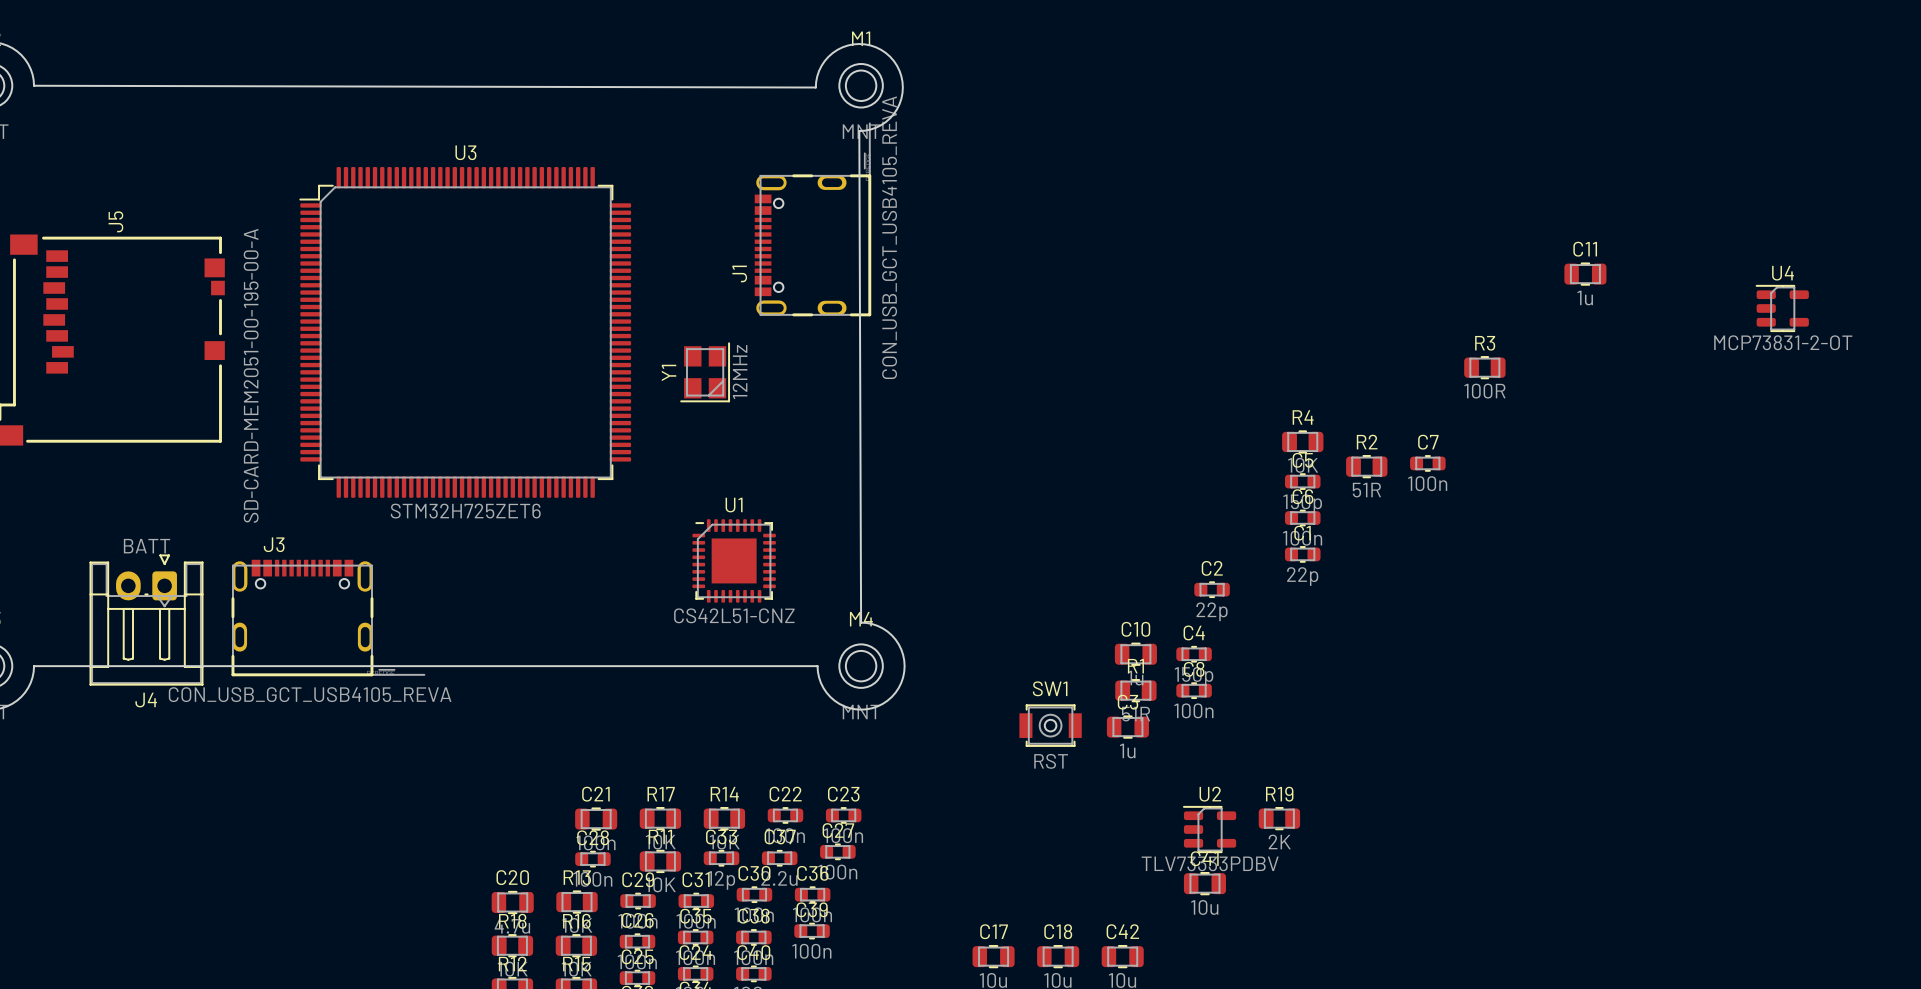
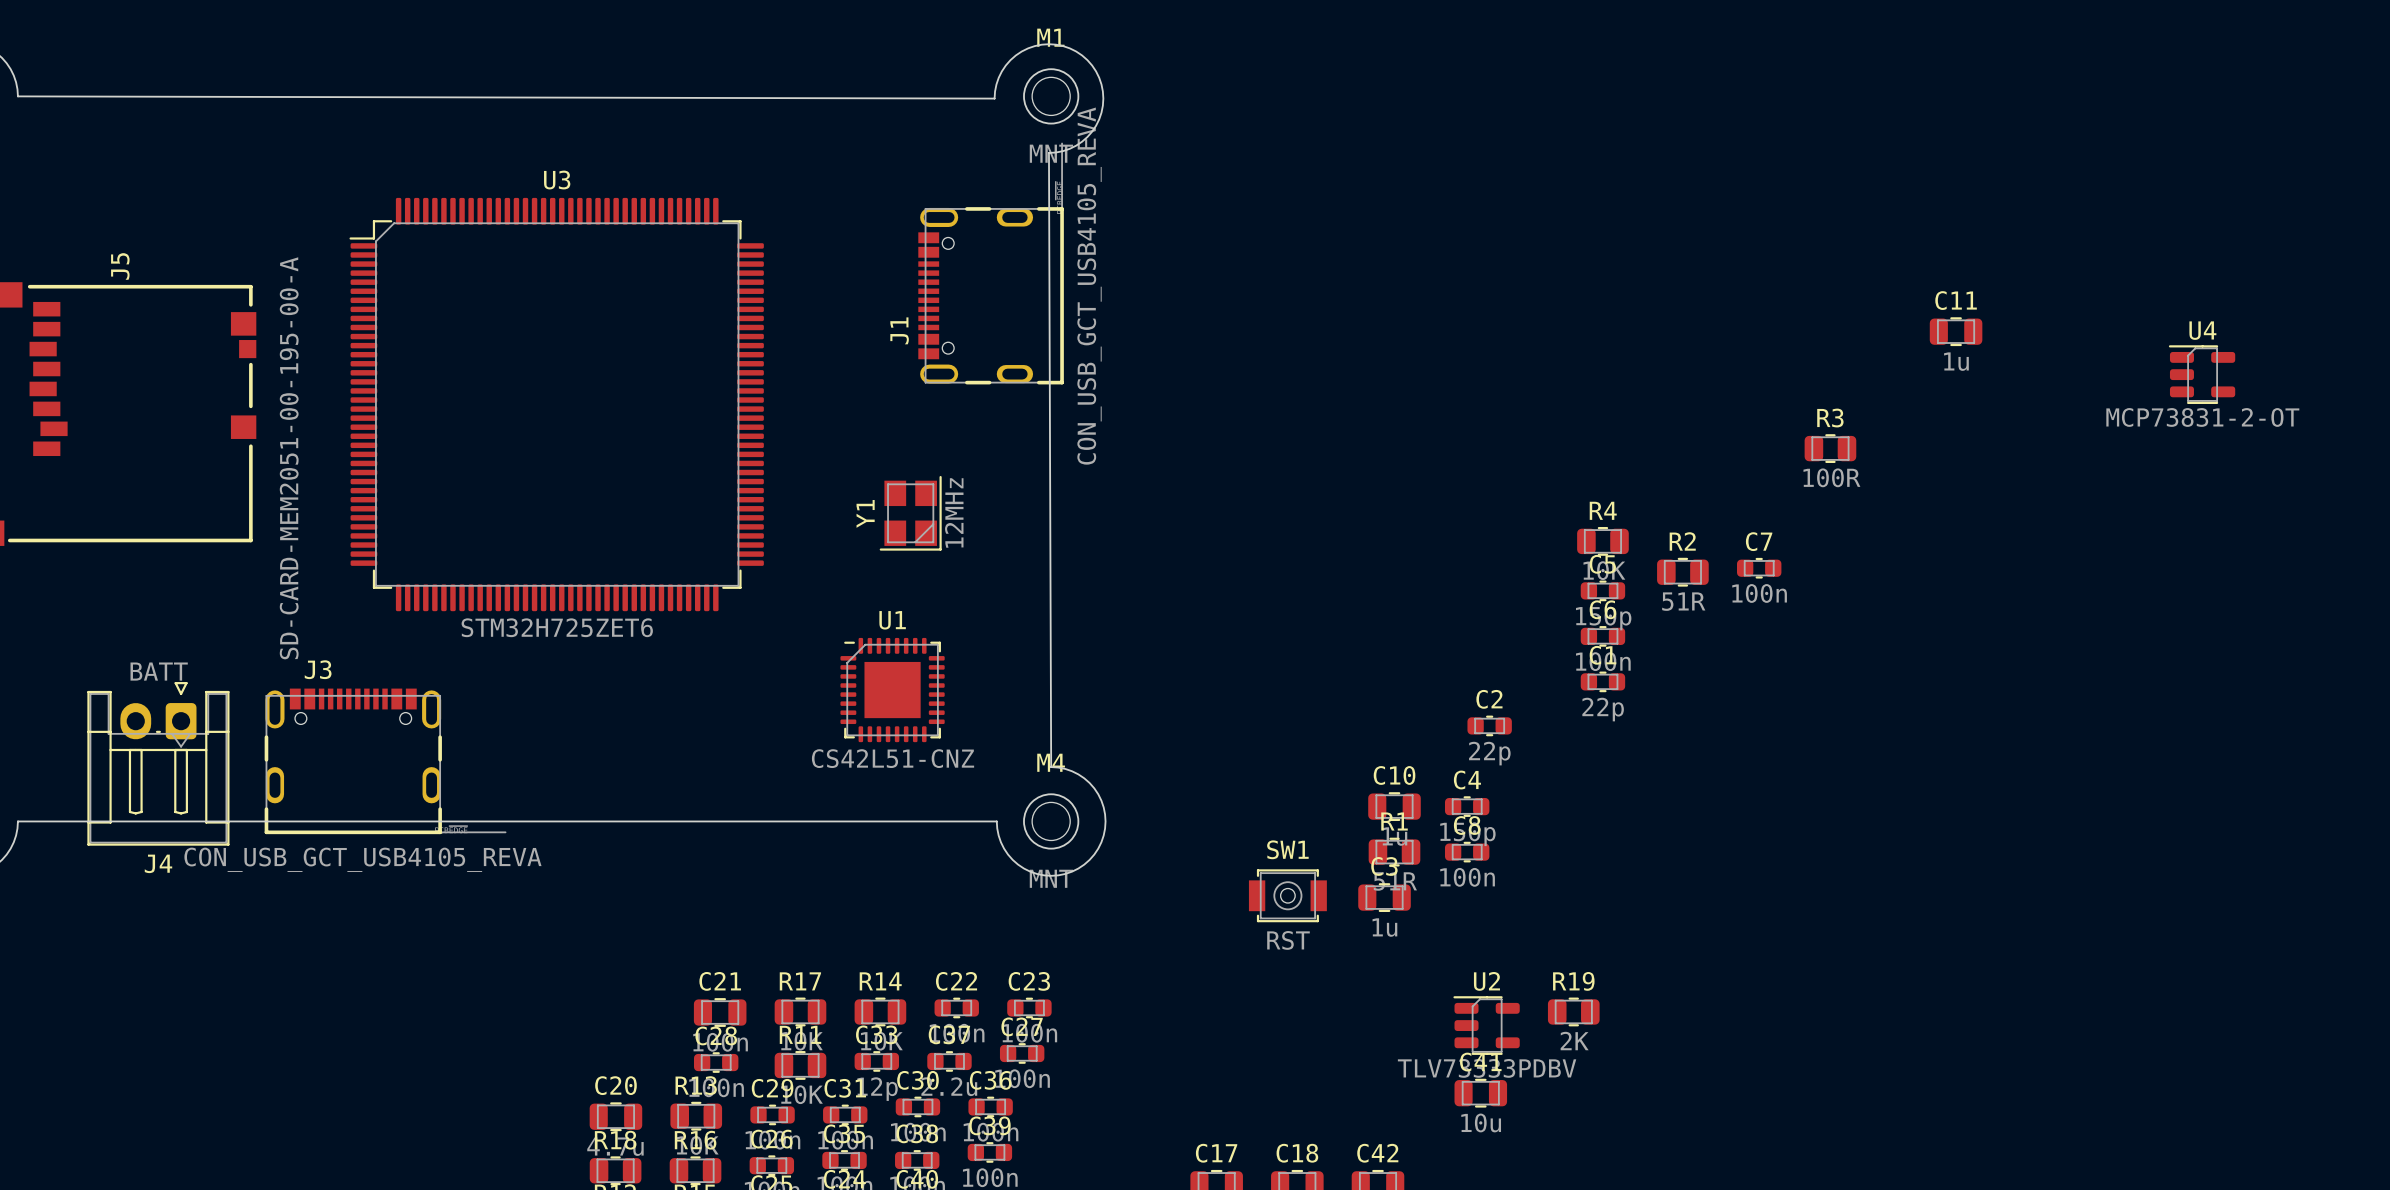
Y1 position: (705, 372) -> (910, 513)

